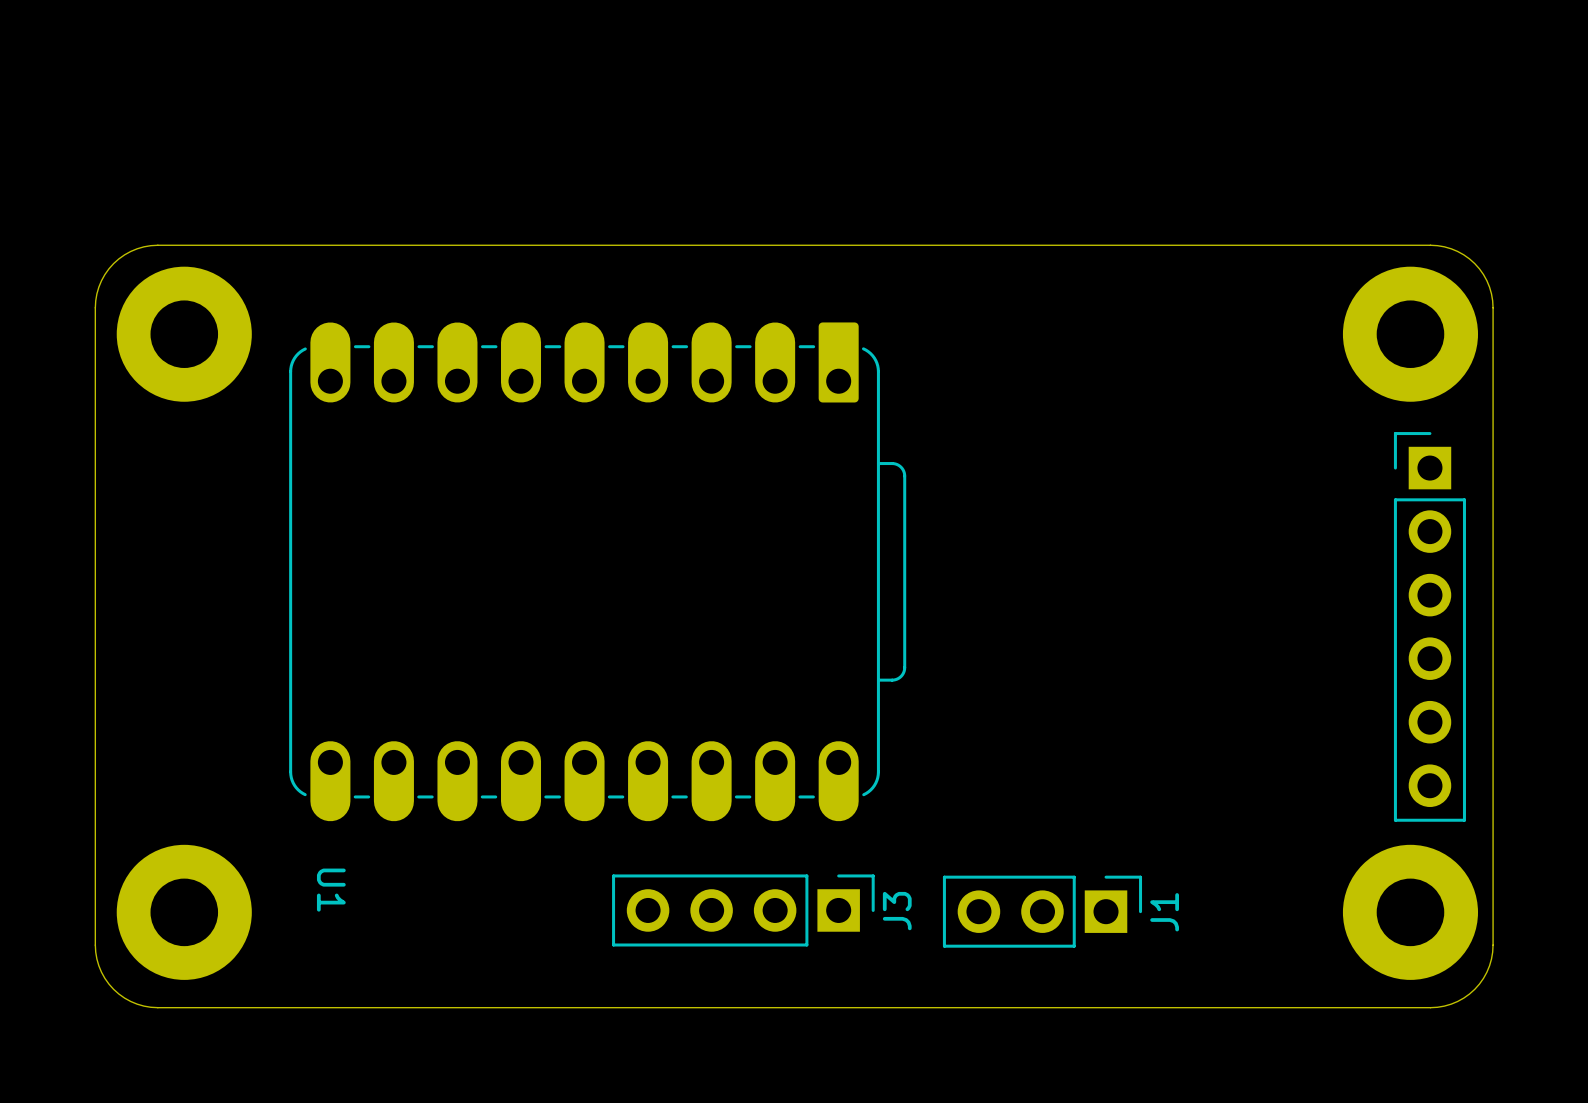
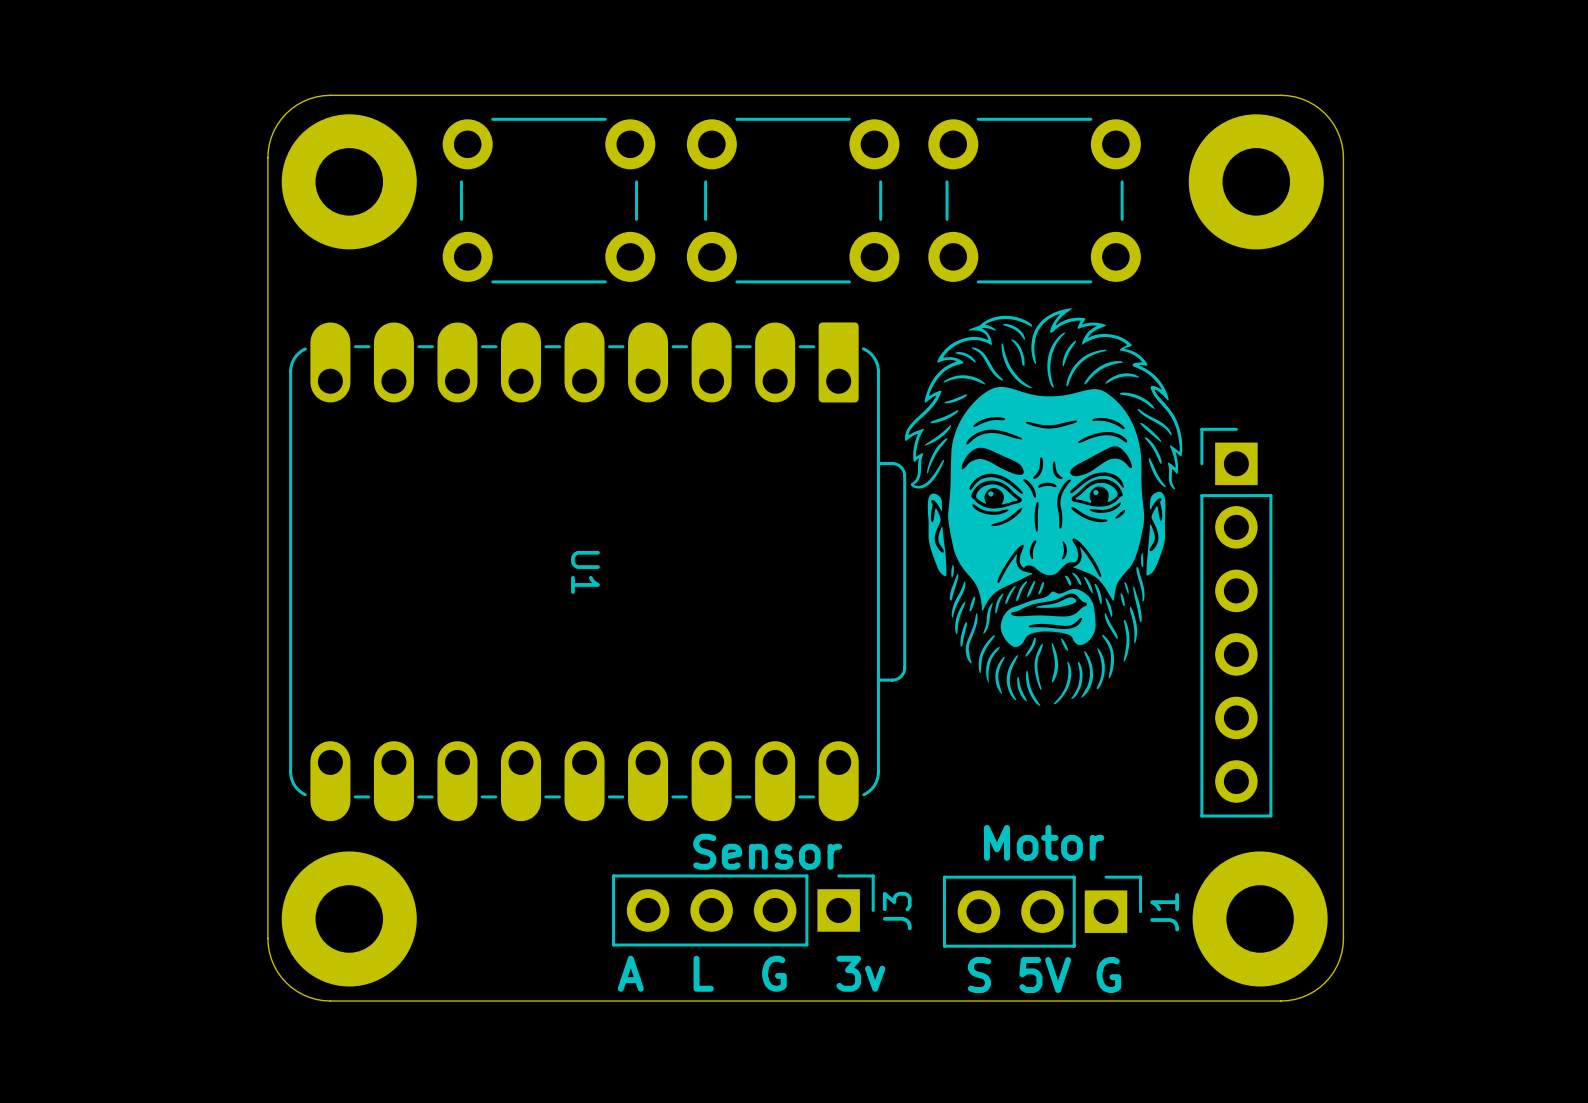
part: none -> (548, 200)
part: none -> (793, 200)
part: none -> (1034, 200)
board edge: (157, 245) (1430, 245) (1444, 246) (1457, 251) (1469, 258) (1483, 274) (1491, 293) (1493, 307) (1493, 945) (1491, 959) (1486, 972) (1479, 984) (1463, 998) (1451, 1004) (1430, 1007) (157, 1007) (143, 1006) (130, 1001) (118, 994) (104, 978) (96, 959) (95, 945) (95, 307) (98, 287) (104, 274) (113, 263) (124, 254) (137, 248) (157, 245) -> (330, 95) (316, 96) (303, 101) (286, 113) (274, 130) (269, 143) (267, 157) (267, 938) (269, 952) (274, 965) (281, 977) (291, 987) (309, 997) (330, 1001) (1280, 1001) (1294, 999) (1308, 994) (1319, 987) (1329, 977) (1339, 959) (1343, 938) (1343, 157) (1341, 143) (1337, 130) (1329, 118) (1319, 108) (1301, 98) (1280, 95) (330, 95)
drawing: none -> [905, 308, 1183, 707]
part position: (184, 334) -> (349, 181)
part position: (1410, 334) -> (1256, 181)
part position: (1429, 626) -> (1236, 622)
text: none -> Motor (1044, 842)
text: none -> Sensor (767, 851)
U1 name position: U1 (331, 890) -> U1 (585, 572)
part position: (184, 912) -> (349, 918)
part position: (1410, 912) -> (1260, 918)
text: none -> A L G 3v (751, 973)
text: none -> S 5V G (1044, 975)

